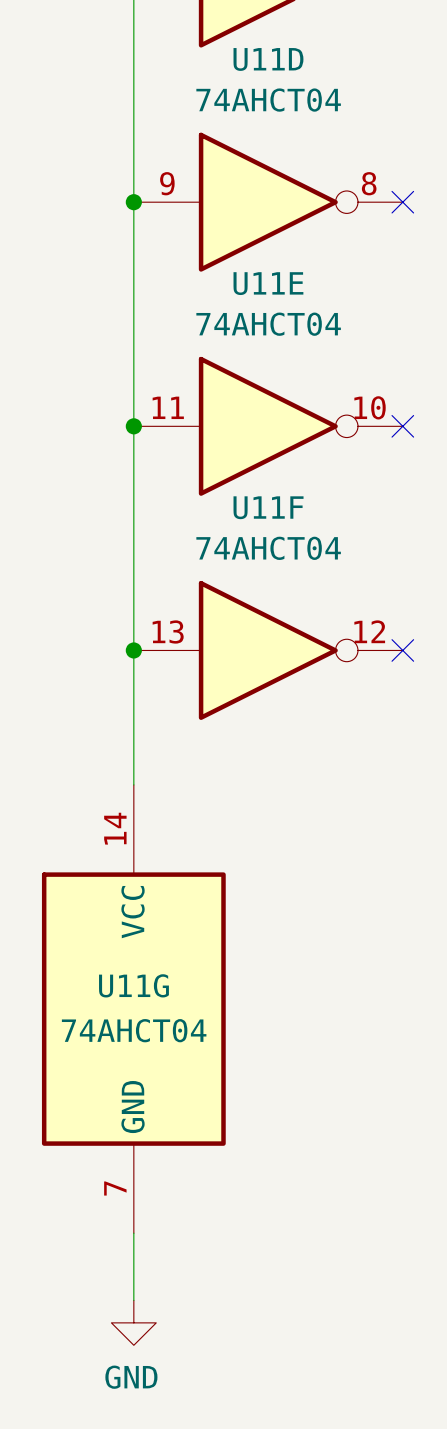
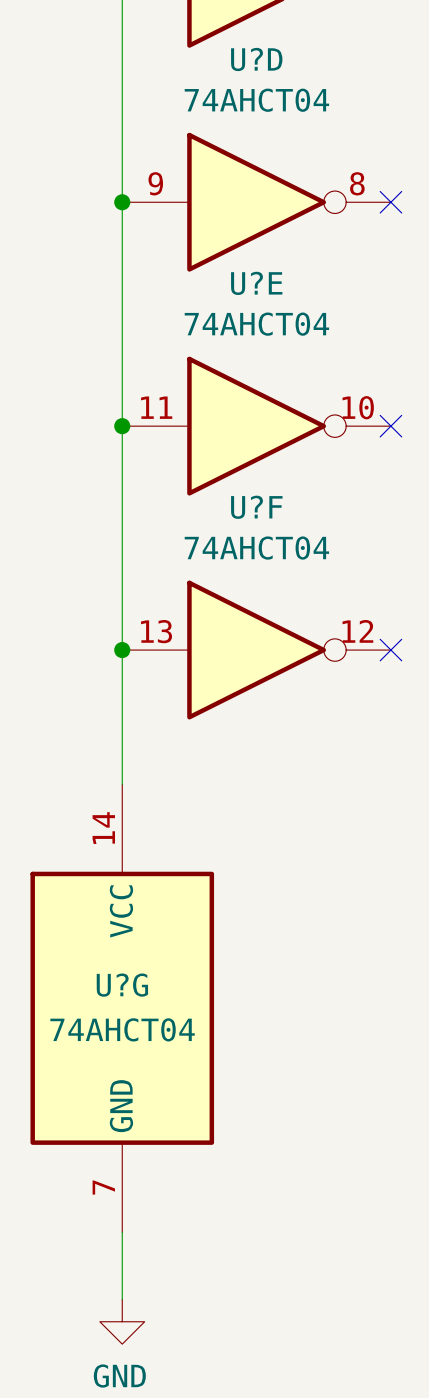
U11D name: U11D (268, 59) -> U?D (256, 59)
U11E name: U11E (268, 283) -> U?E (256, 283)
U11F name: U11F (268, 507) -> U?F (256, 507)
U11G name: U11G (133, 985) -> U?G (122, 985)

